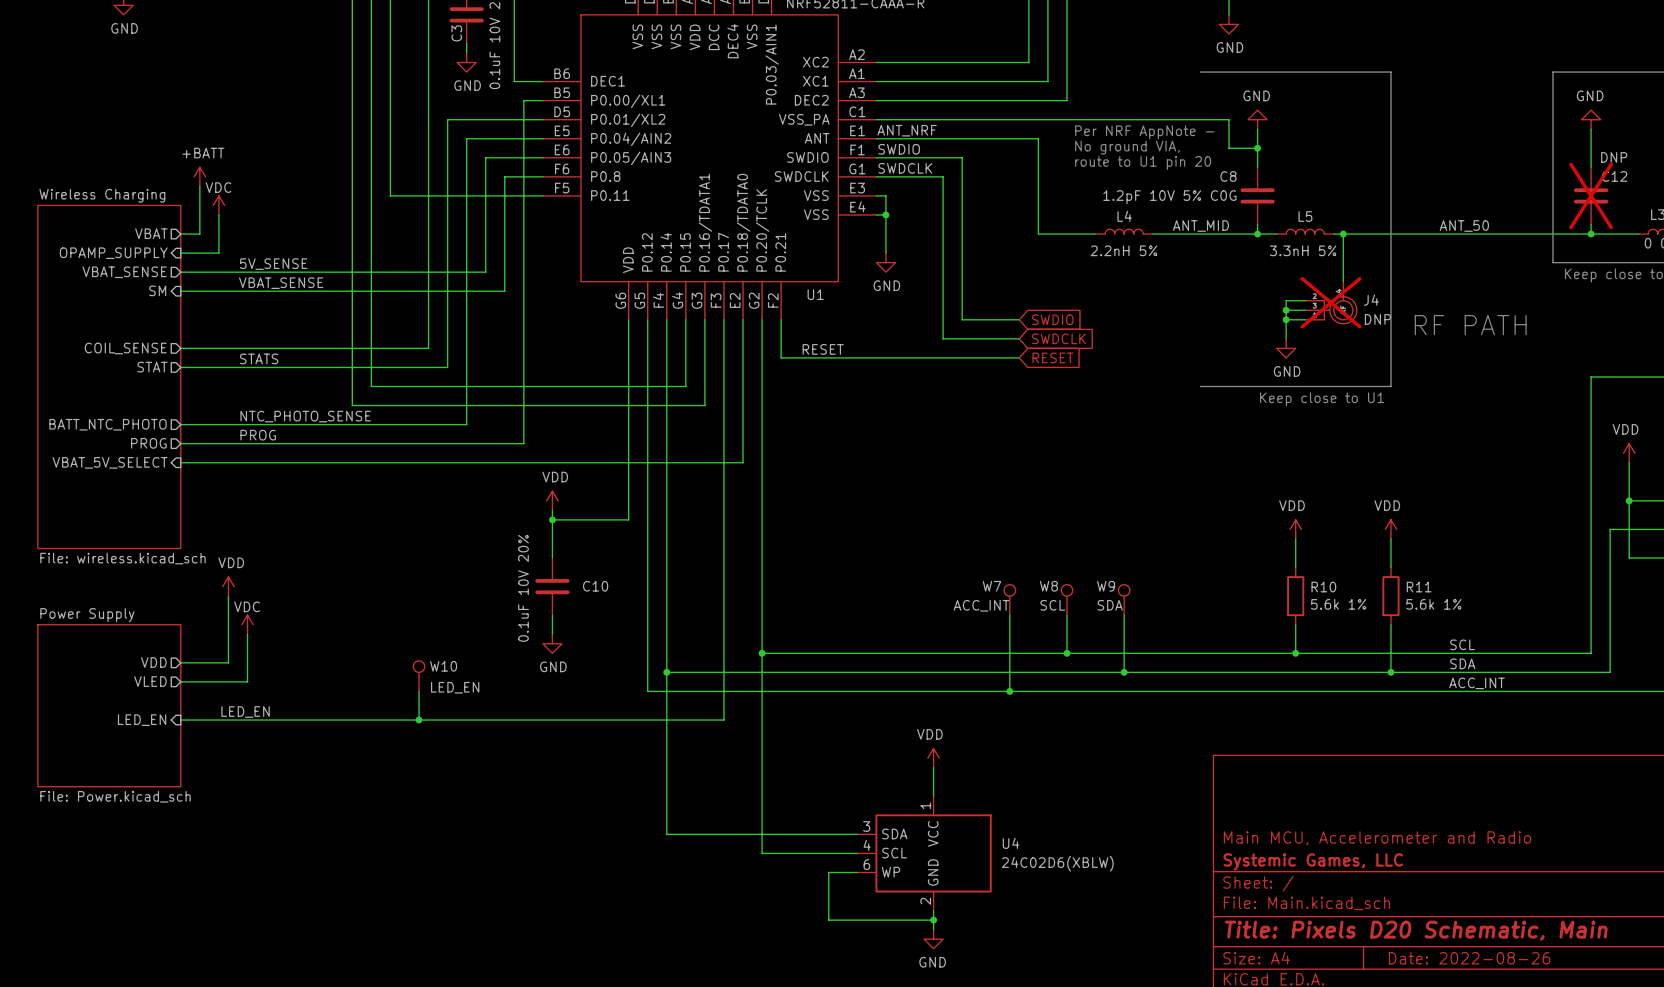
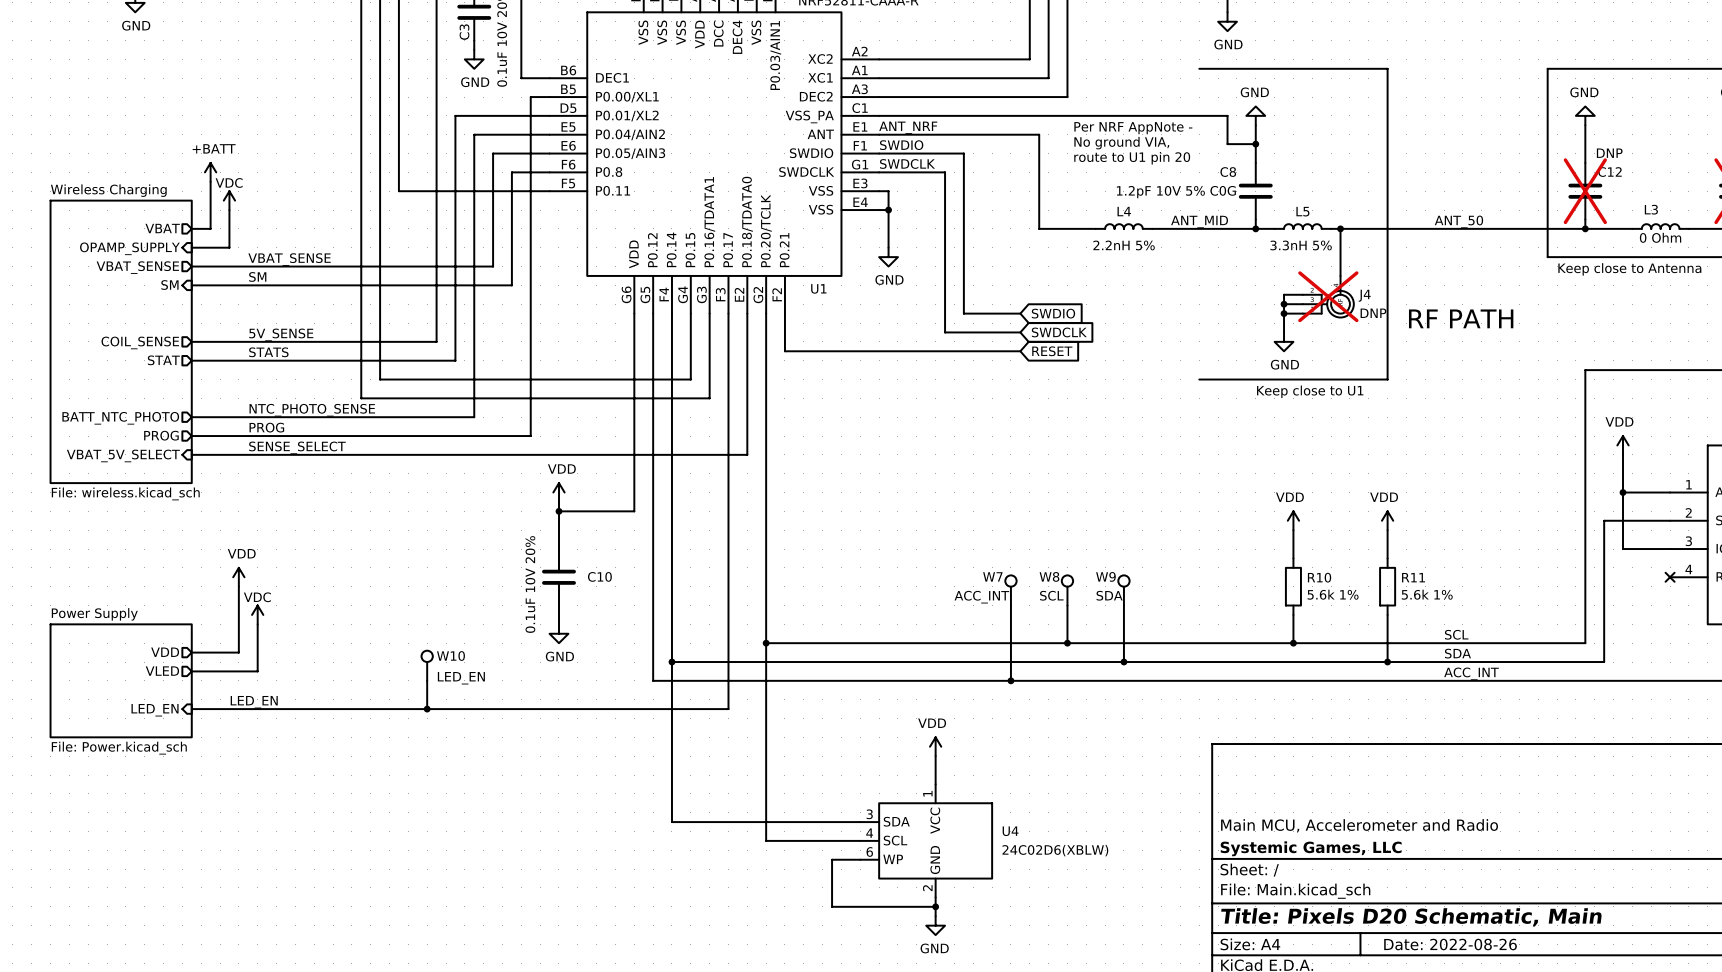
label: 5V_SENSE (273, 264) -> VBAT_SENSE (289, 259)
label: VBAT_SENSE (281, 283) -> SM (257, 276)
label: none -> 5V_SENSE (281, 334)
sheet Wireless Charging: none -> File: wireless.kicad_sch (121, 341)
label: RESET (823, 349) -> none
sheet Wireless Charging: File: wireless.kicad_sch (109, 376) -> none
label: none -> SENSE_SELECT (297, 447)
sheet Power Supply: none -> File: Power.kicad_sch (121, 680)
sheet Power Supply: File: Power.kicad_sch (109, 705) -> none

